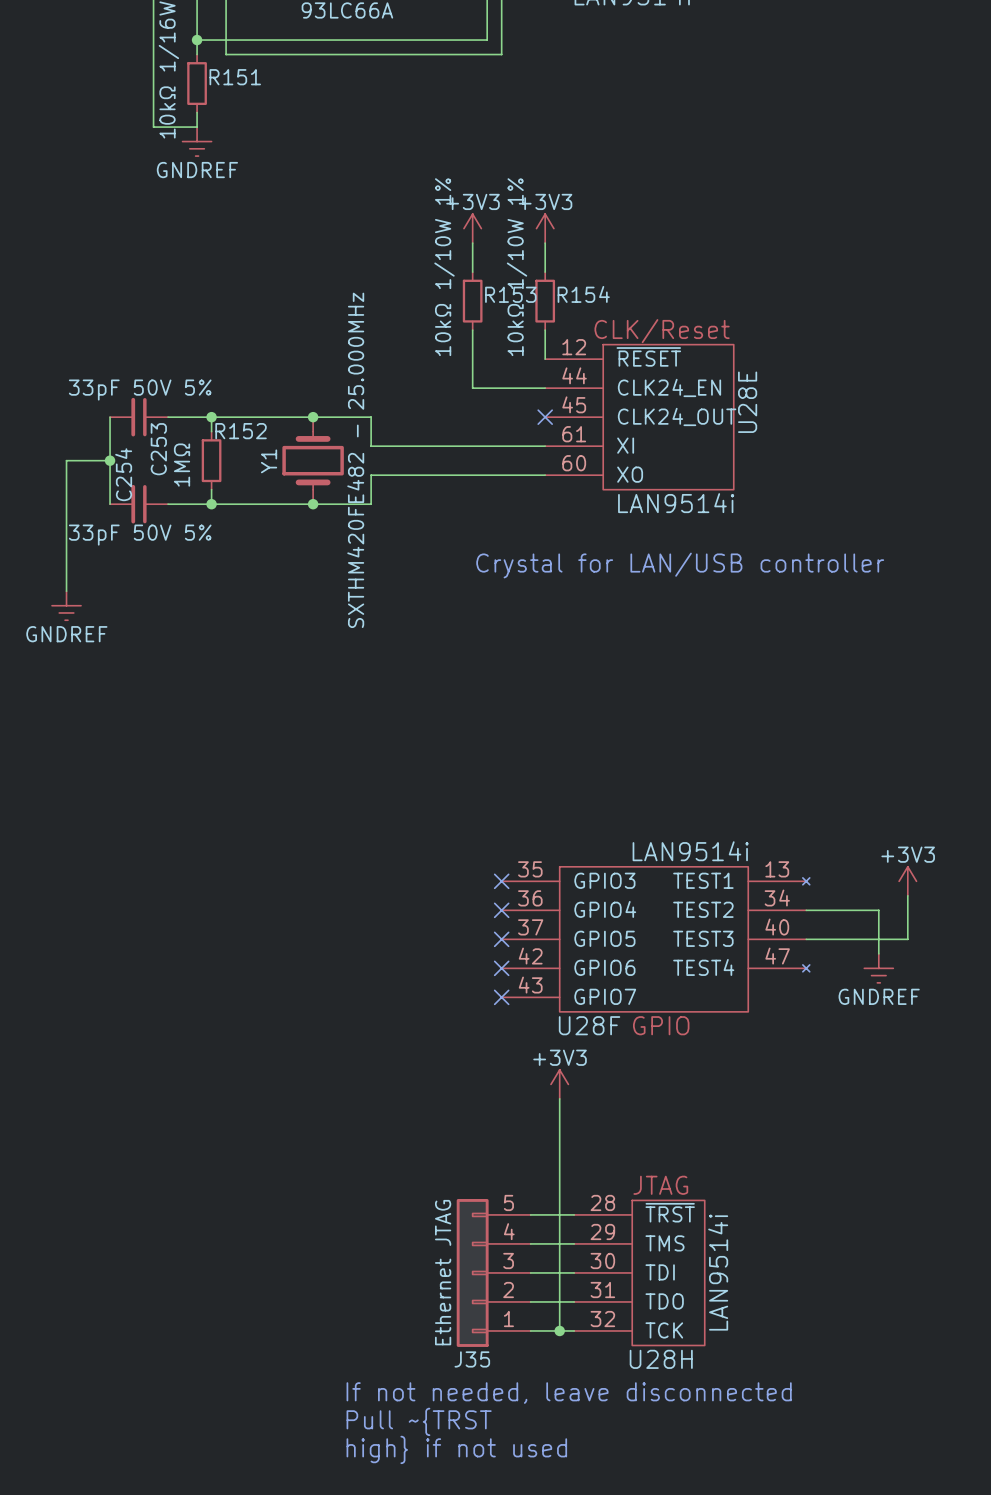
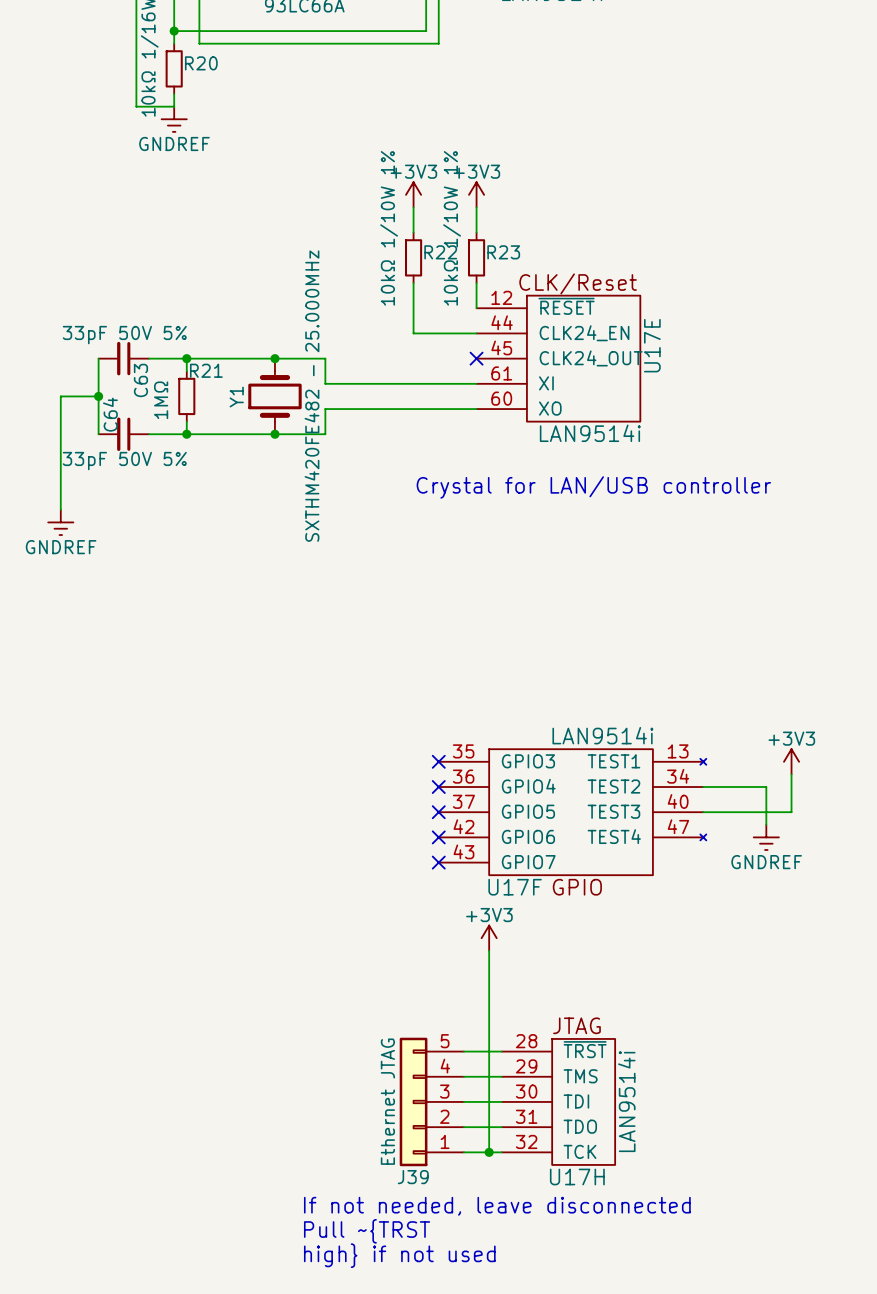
R151 name: R151 (235, 77) -> R20 (201, 63)
R153 name: R153 (510, 294) -> R22 (440, 252)
R154 name: R154 (583, 294) -> R23 (503, 252)
U28E name: U28E (747, 402) -> U17E (652, 345)
R152 name: R152 (241, 431) -> R21 (206, 370)
C253 name: C253 (158, 449) -> C63 (140, 380)
C254 name: C254 (123, 474) -> C64 (110, 414)
U28F name: U28F (589, 1025) -> U17F (515, 887)
J35 name: J35 (472, 1359) -> J39 (413, 1177)
U28H name: U28H (661, 1359) -> U17H (577, 1176)

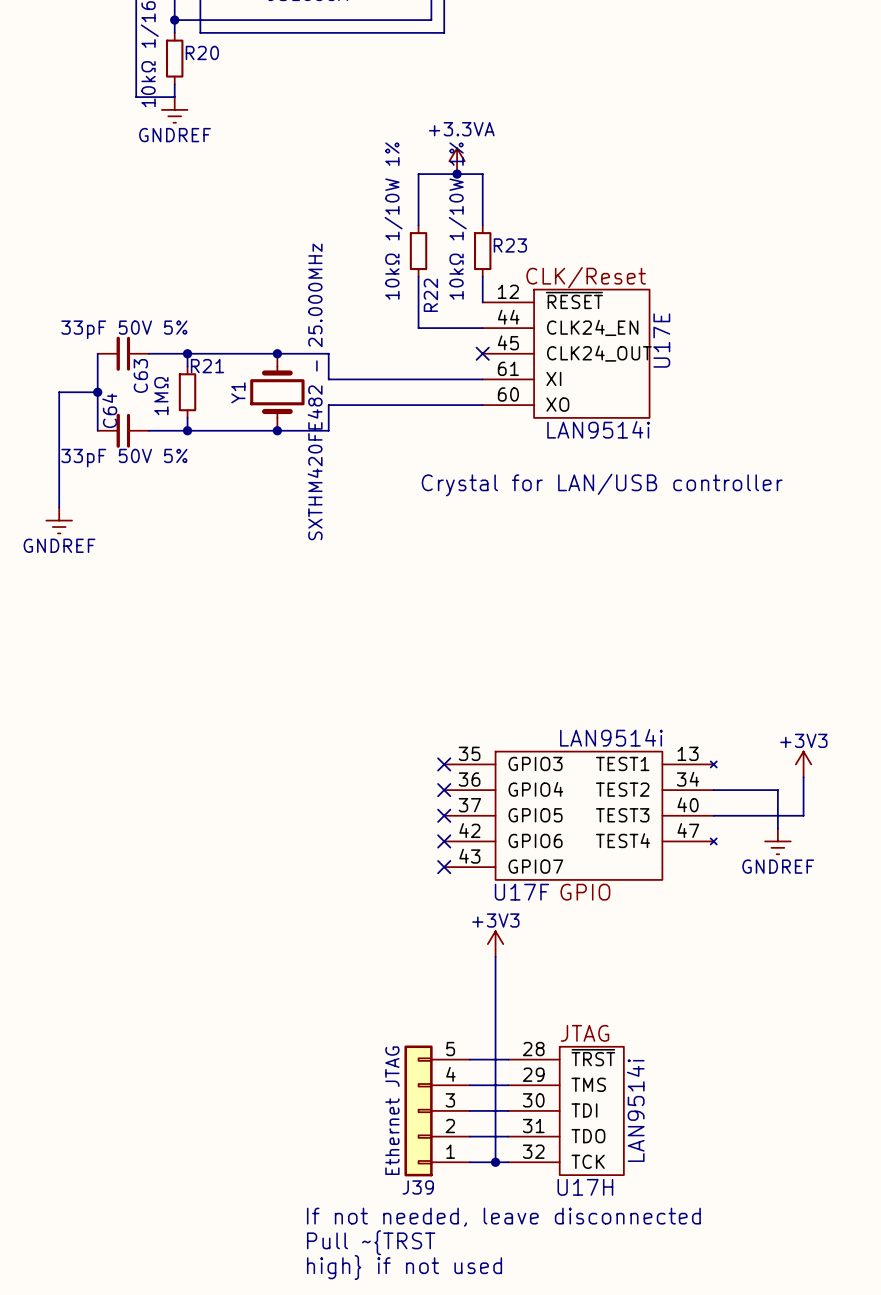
power symbol: none -> +3.3VA (457, 161)
junction: none -> (457, 174)
power symbol: +3V3 (413, 194) -> none
power symbol: +3V3 (476, 194) -> none
wire: none -> (418, 199) (418, 174) (482, 174) (482, 199)
R22 name rotation: 0° (440, 252) -> 90° counterclockwise (430, 295)
R22 name position: R22 (440, 252) -> R22 (430, 295)

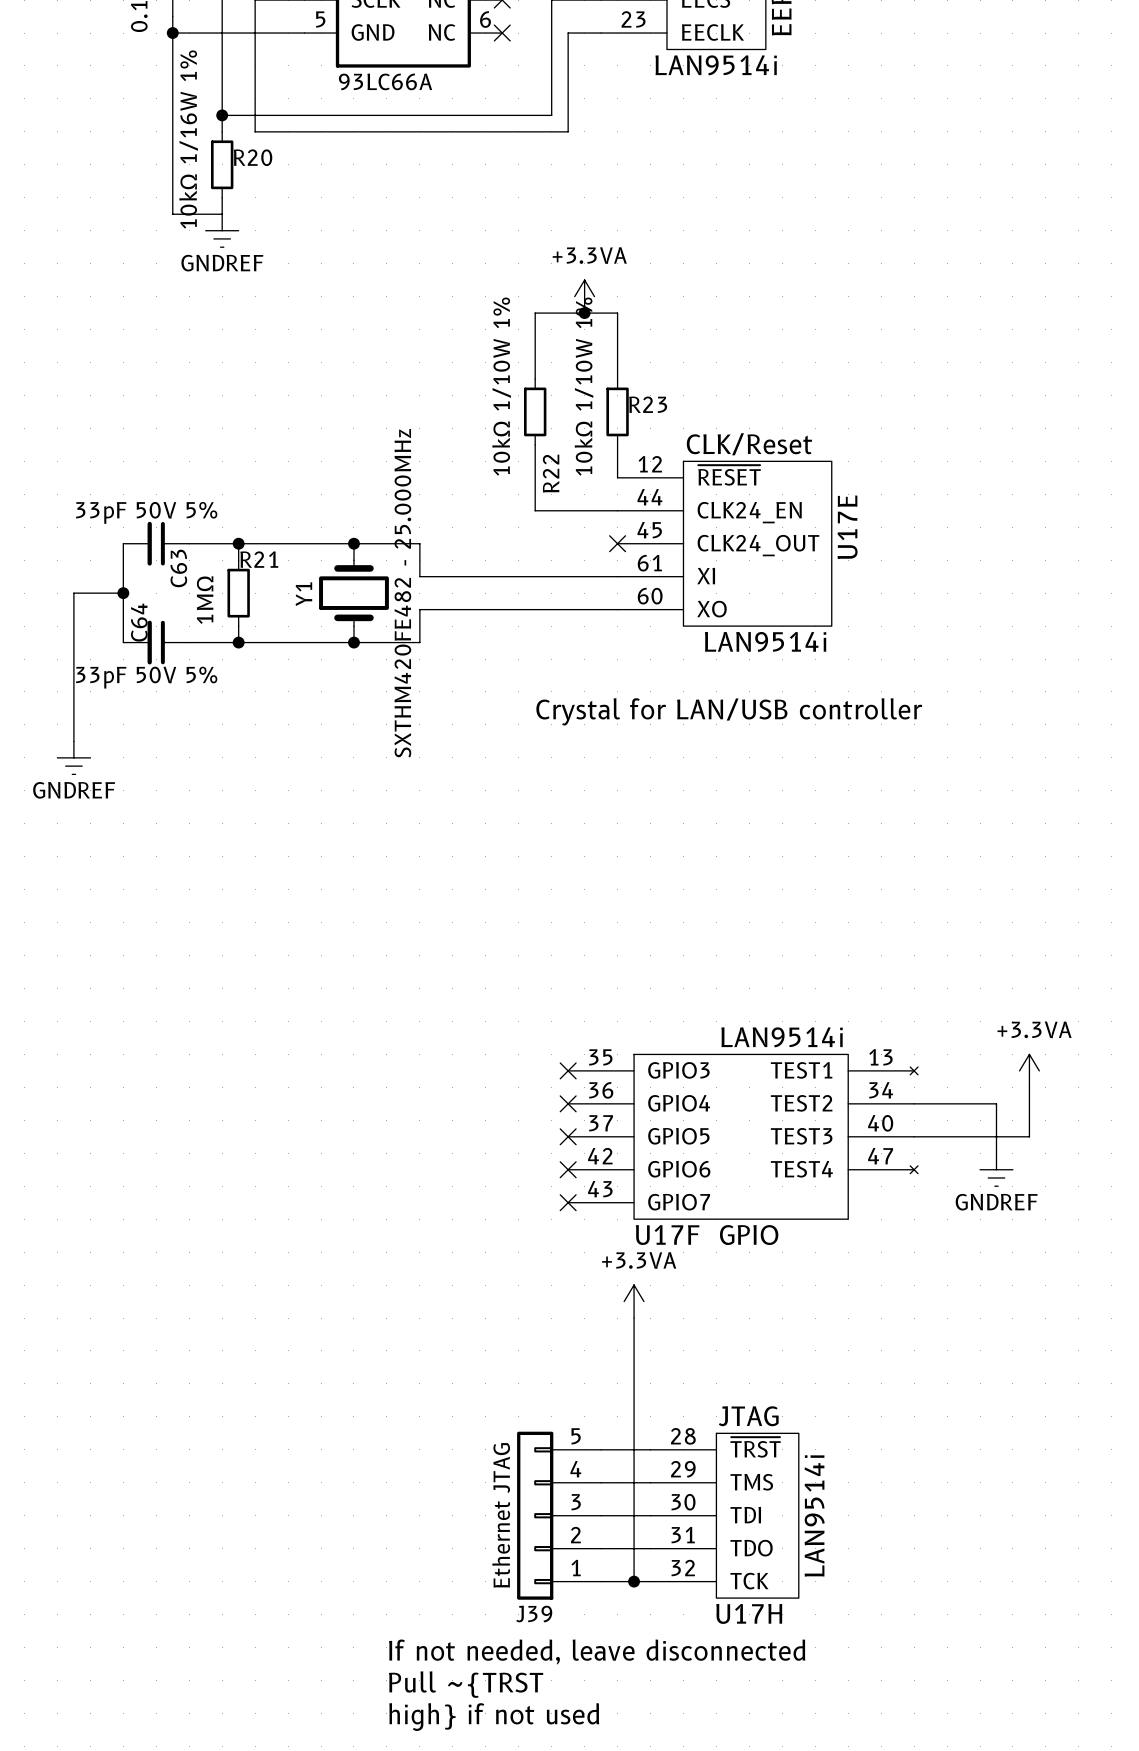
power symbol: +3V3 (803, 764) -> +3.3VA (1029, 1070)
power symbol: +3V3 (495, 944) -> +3.3VA (634, 1301)

